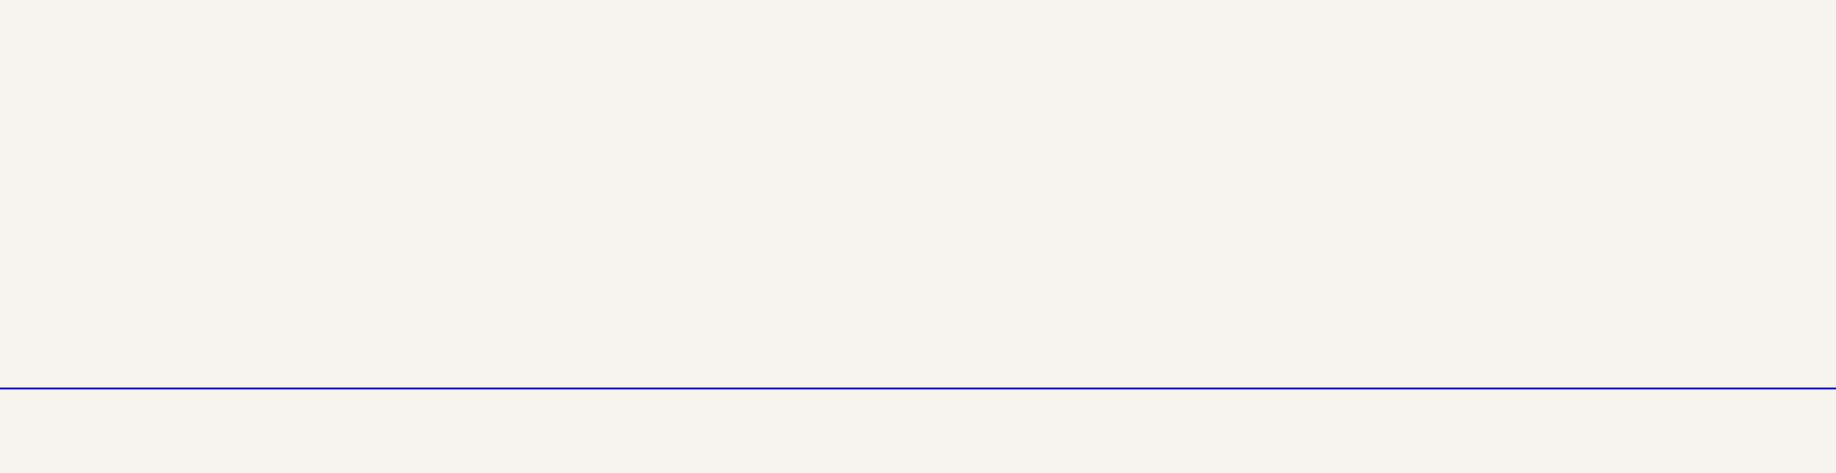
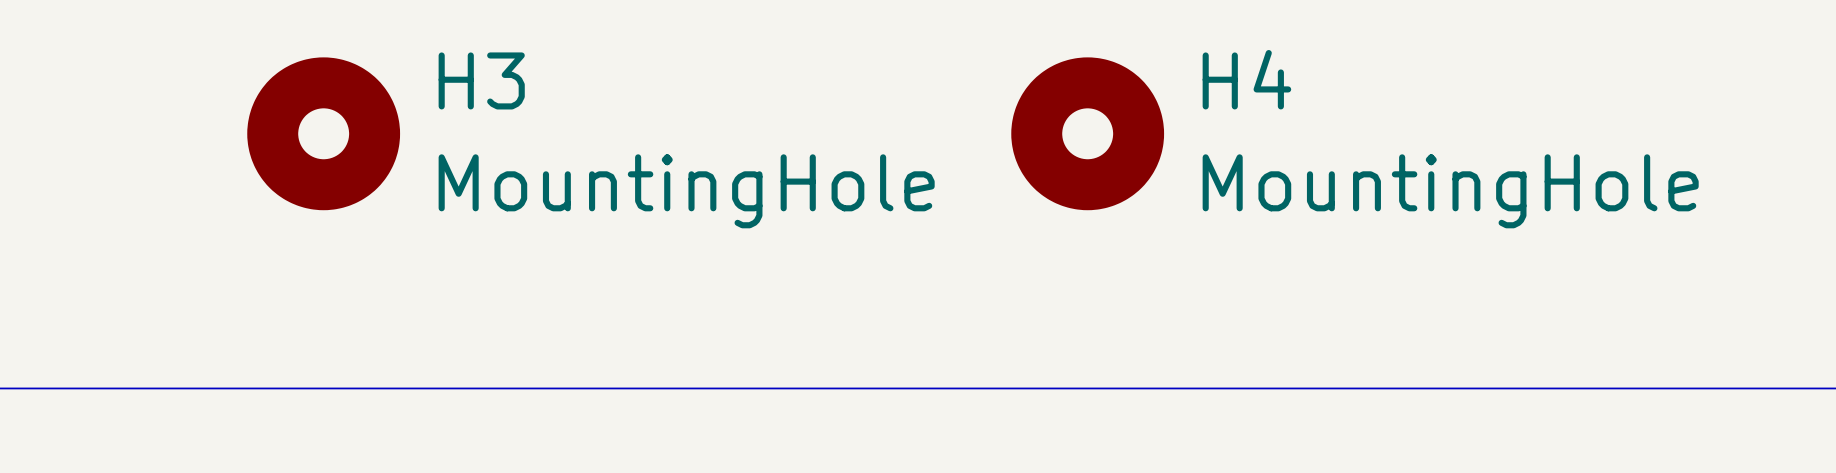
H3: none -> MountingHole (323, 133)
H4: none -> MountingHole (1087, 133)

